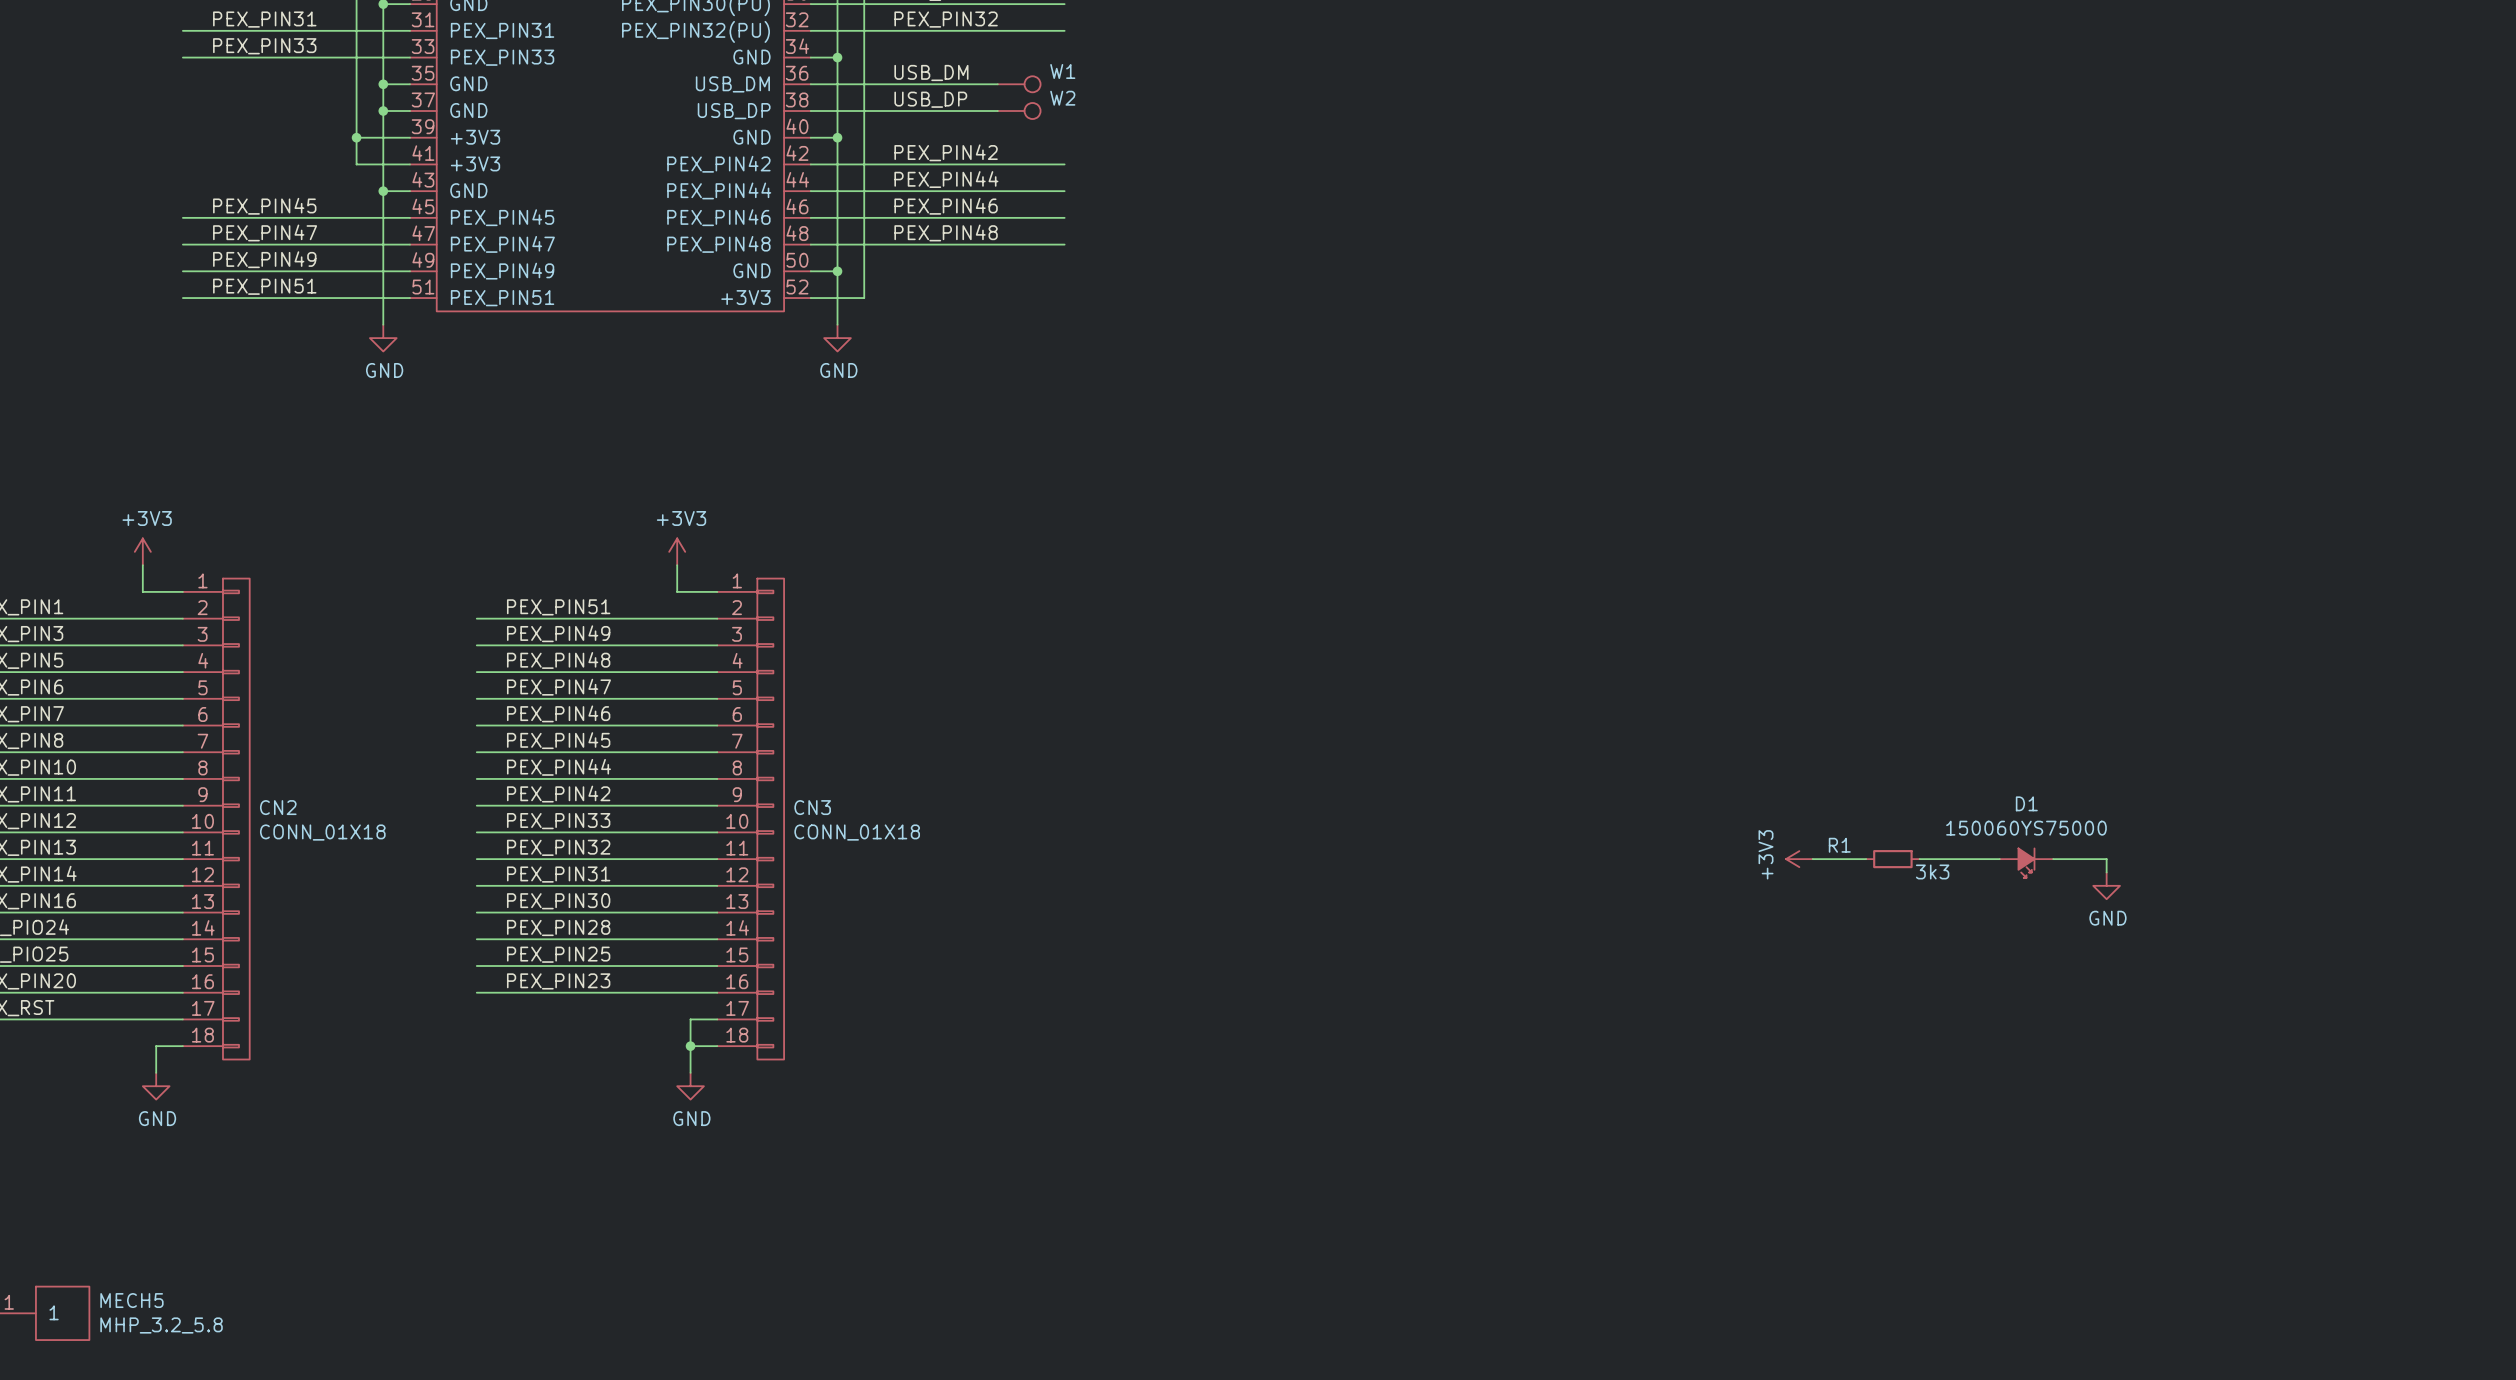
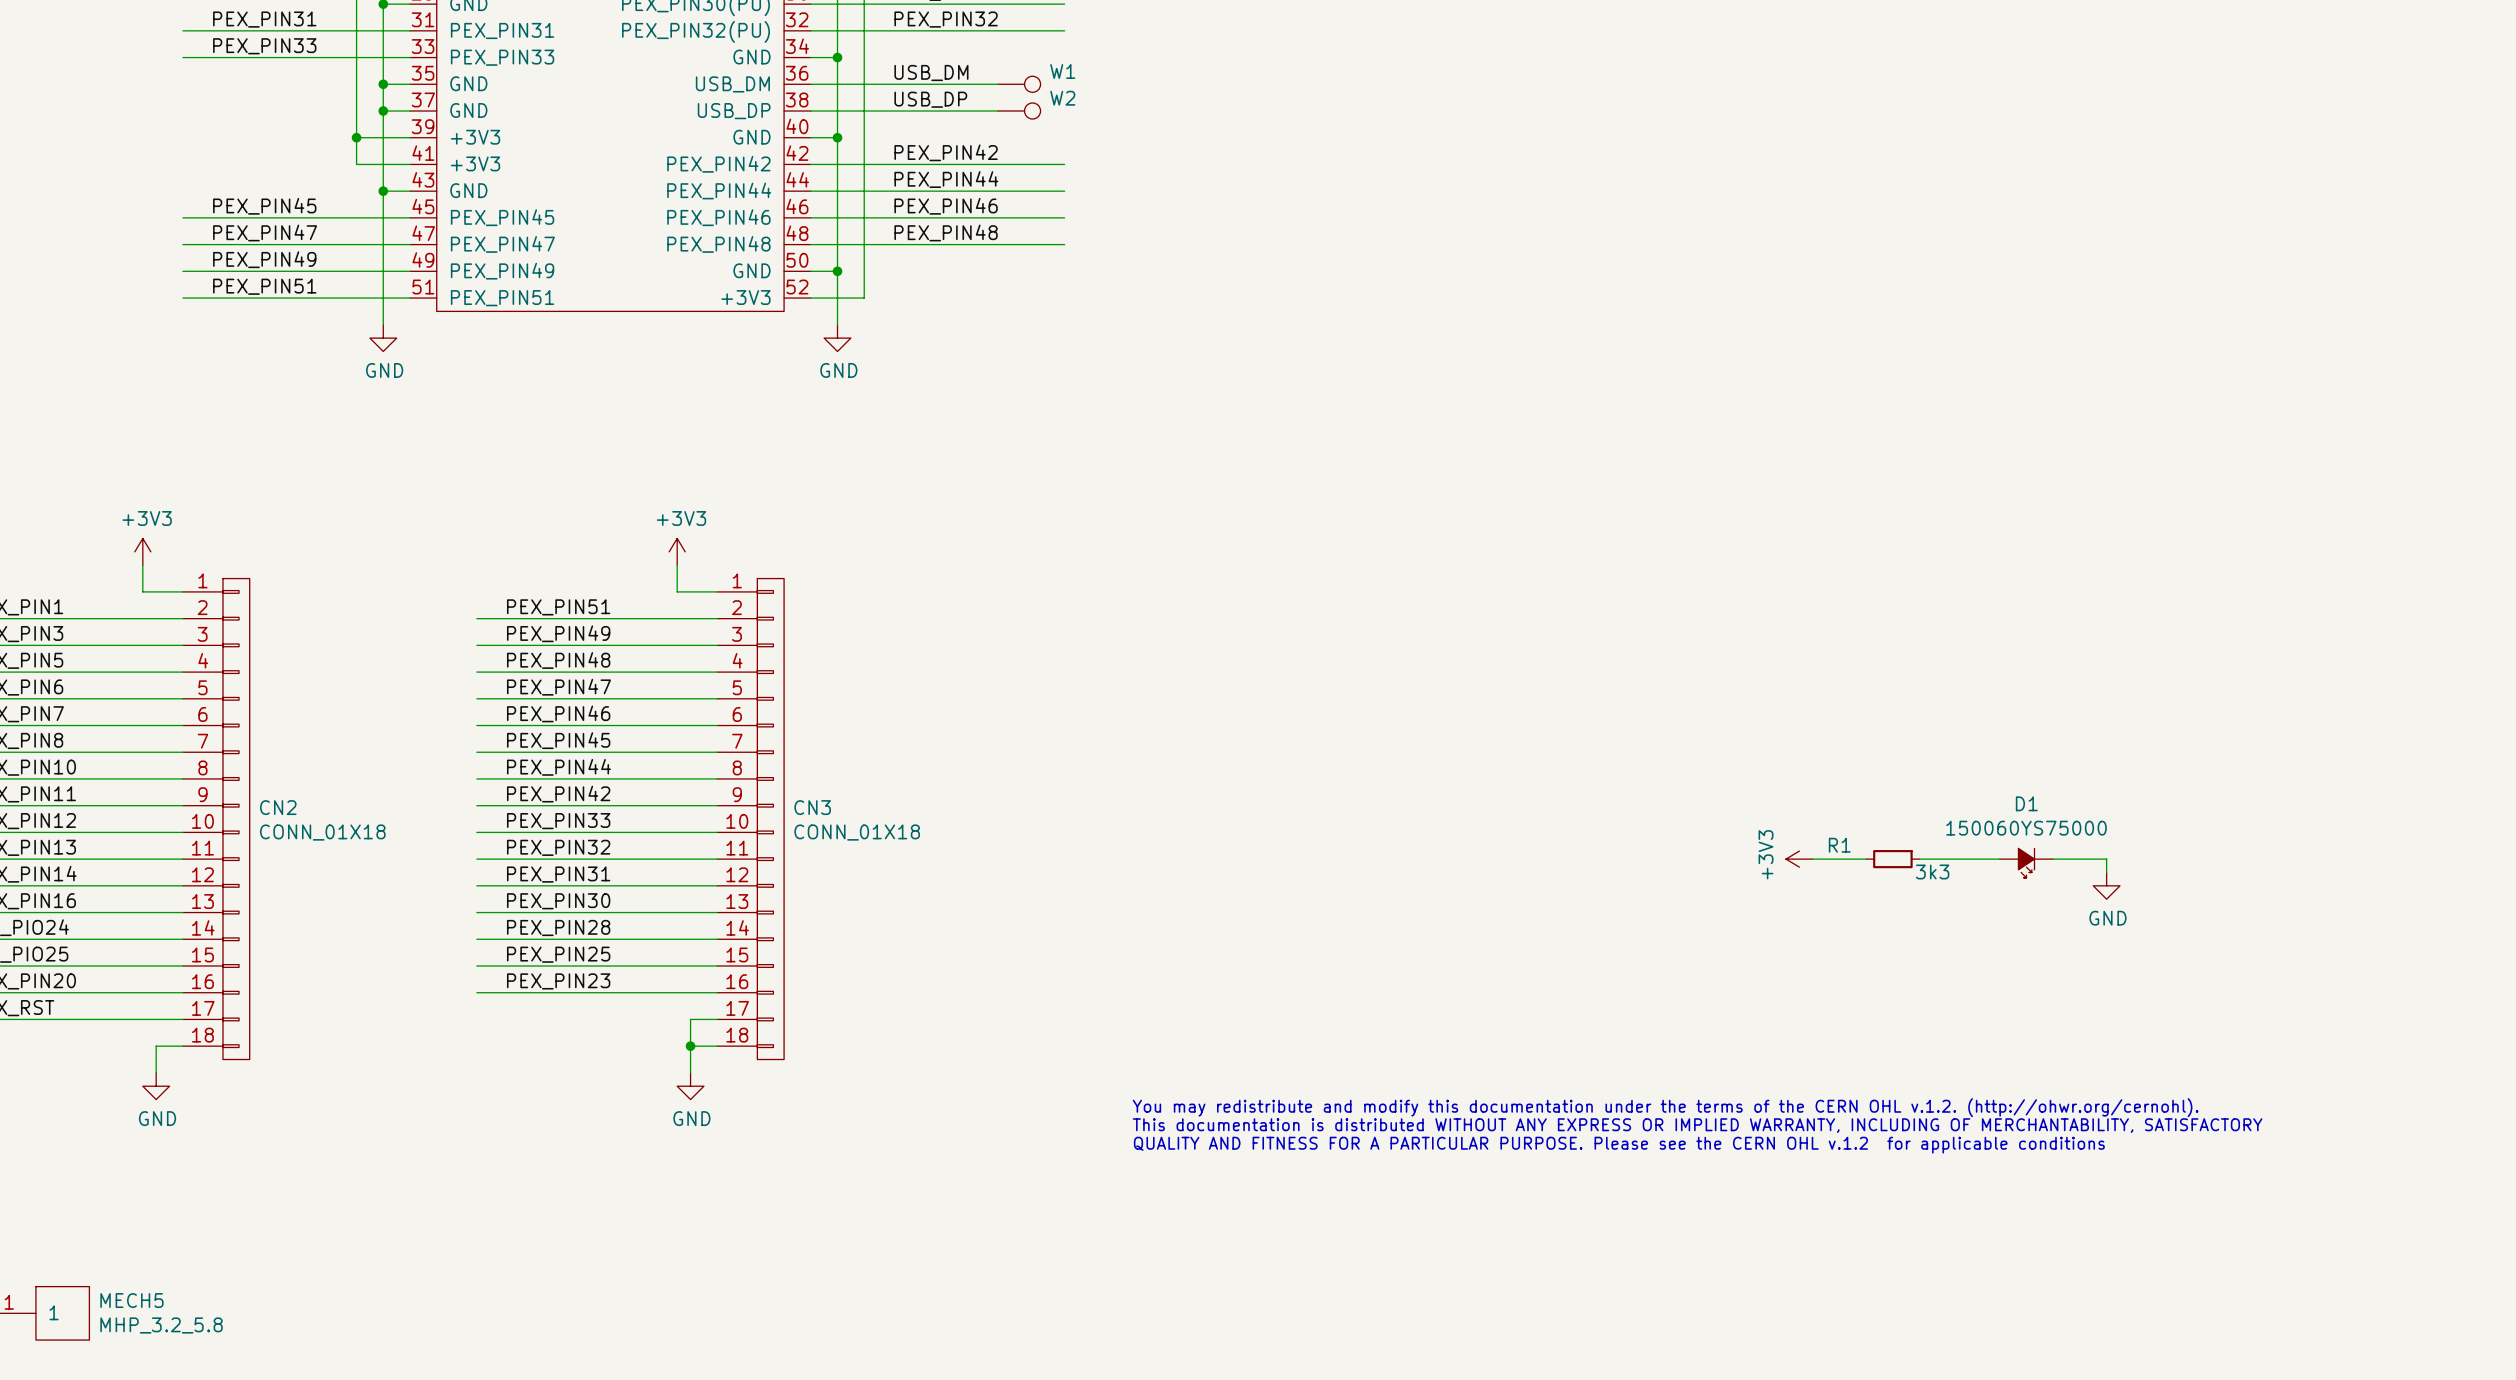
text: none -> You may redistribute and modify this documentation under the terms of the CERN OHL v.1.2. (http://ohwr.org/cernohl). (1665, 1107)
text: none -> This documentation is distributed WITHOUT ANY EXPRESS OR IMPLIED WARRANTY, INCLUDING OF MERCHANTABILITY, SATISFACTORY (1697, 1125)
text: none -> QUALITY AND FITNESS FOR A PARTICULAR PURPOSE. Please see the CERN OHL v.1.2 for applicable conditions (1619, 1145)

